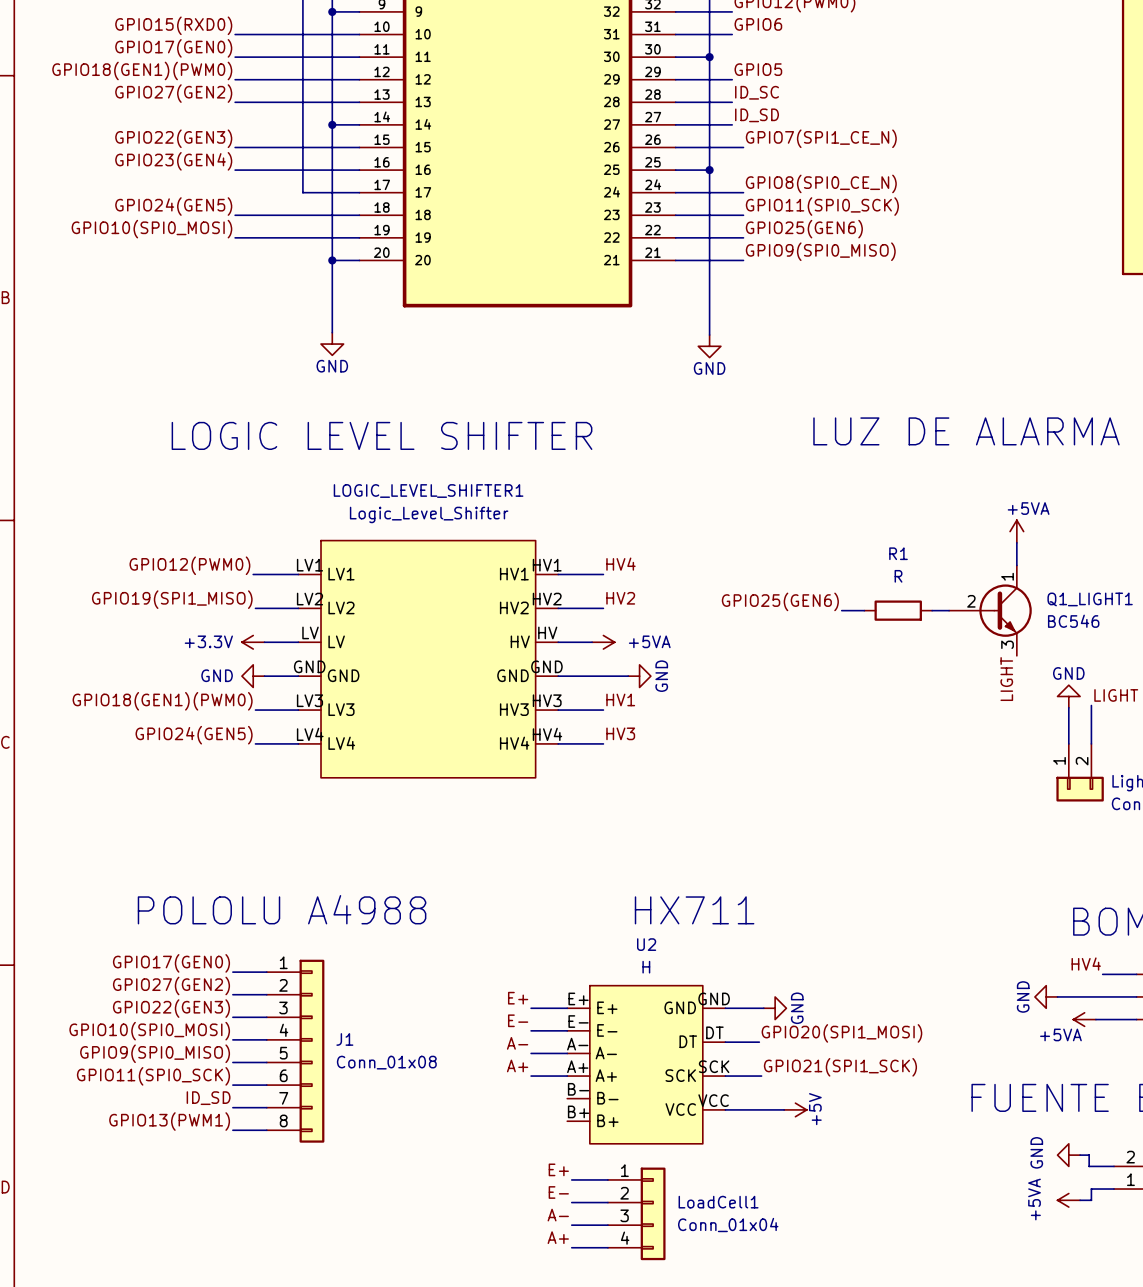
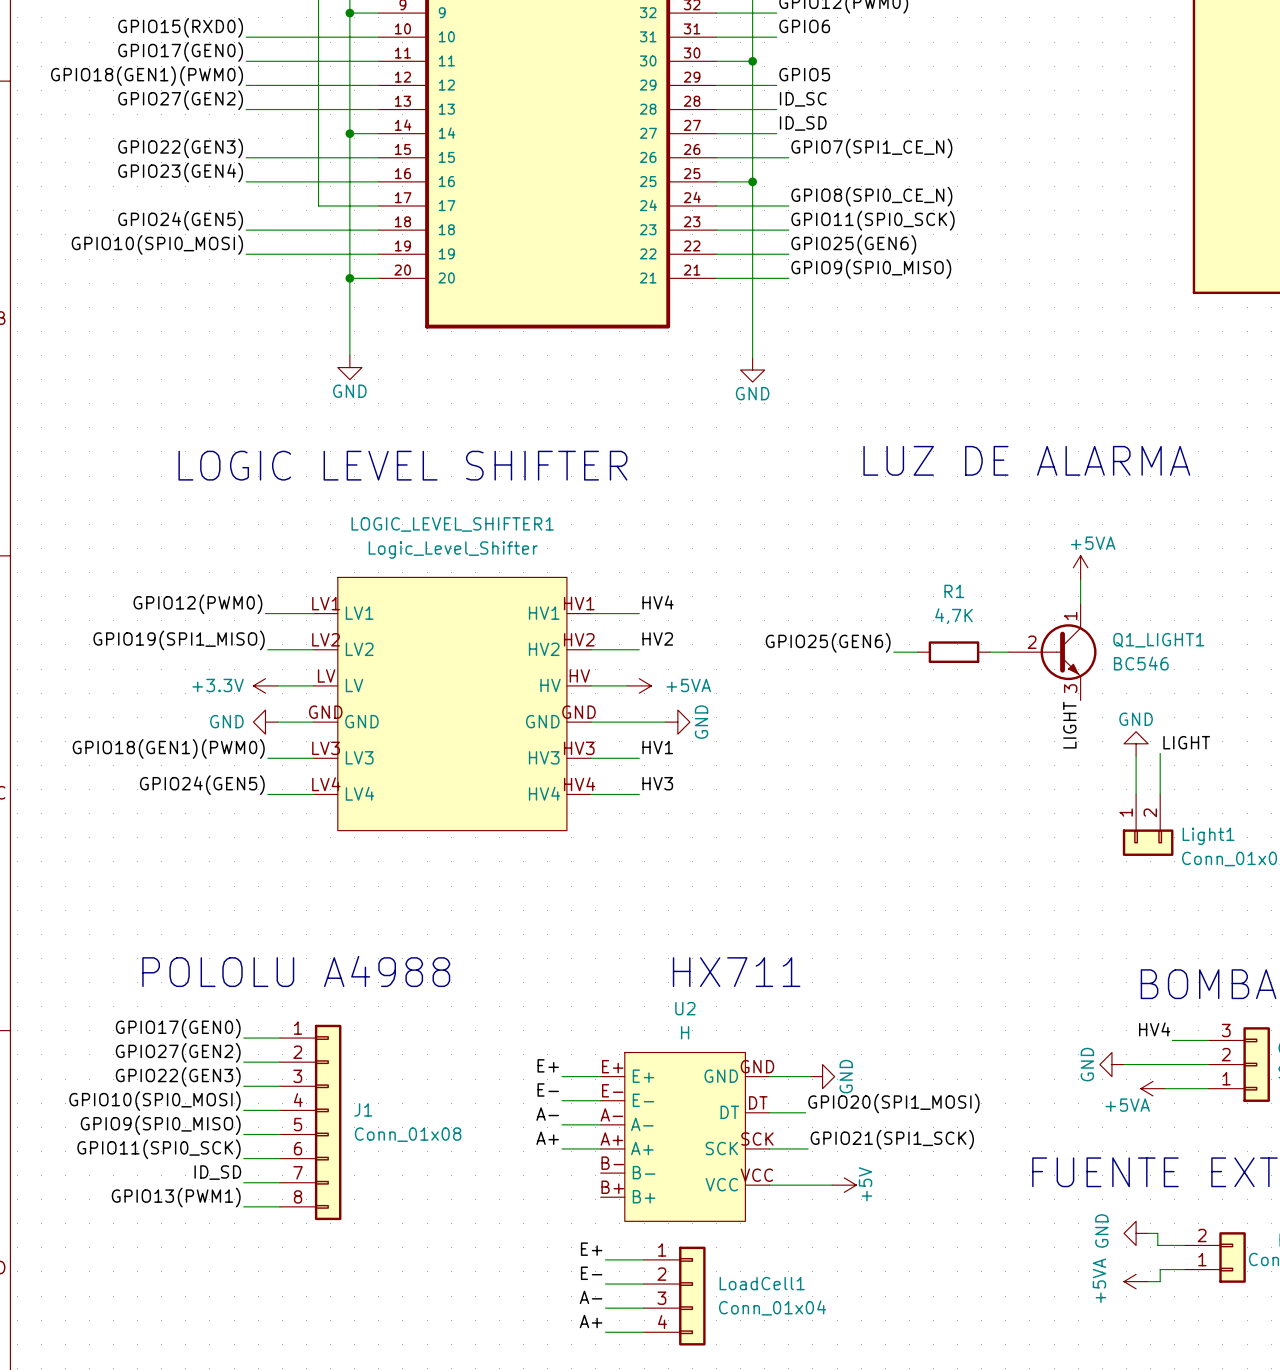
R1 value: R (898, 576) -> 4,7K (954, 616)

